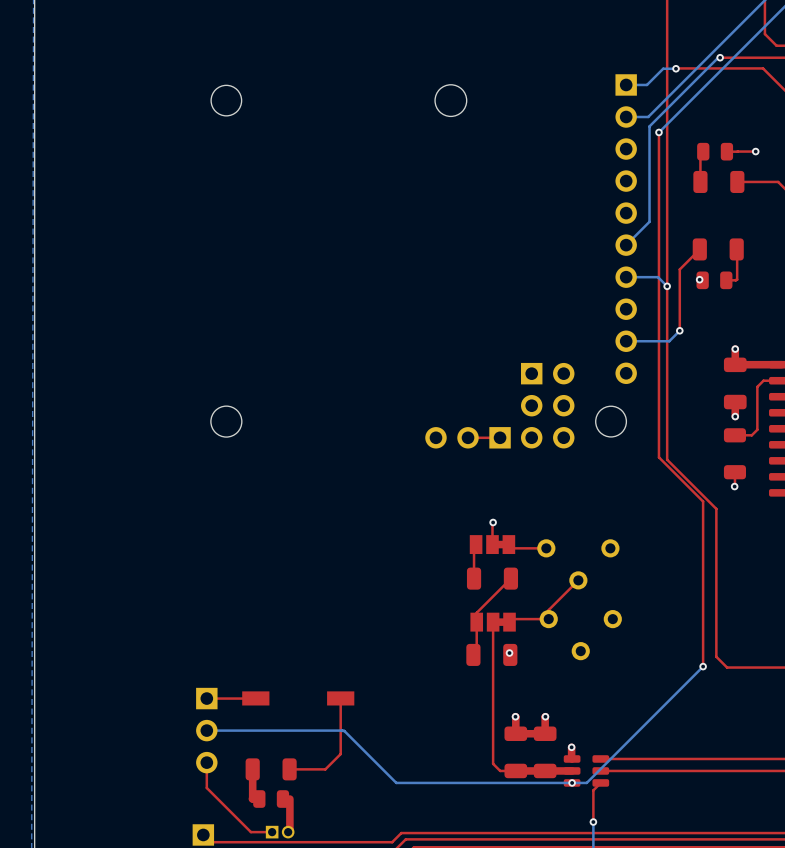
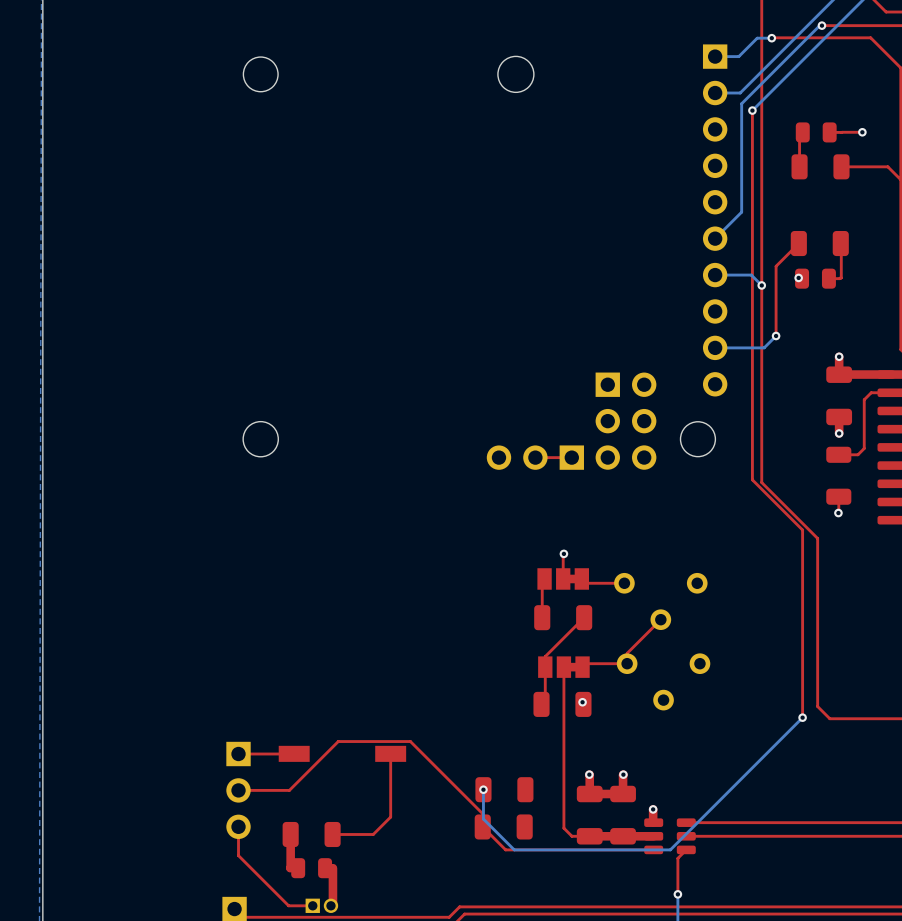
via: none -> (483, 789)
part: none -> (504, 789)
top track: none -> (238, 790) (289, 790) (338, 741) (410, 741) (482, 813) (482, 826) (505, 849) (653, 849)
bottom track: (206, 730) (344, 730) (396, 782) (449, 782) -> (483, 789) (483, 819) (514, 849)
part: none -> (503, 826)
via: (572, 782) -> none

